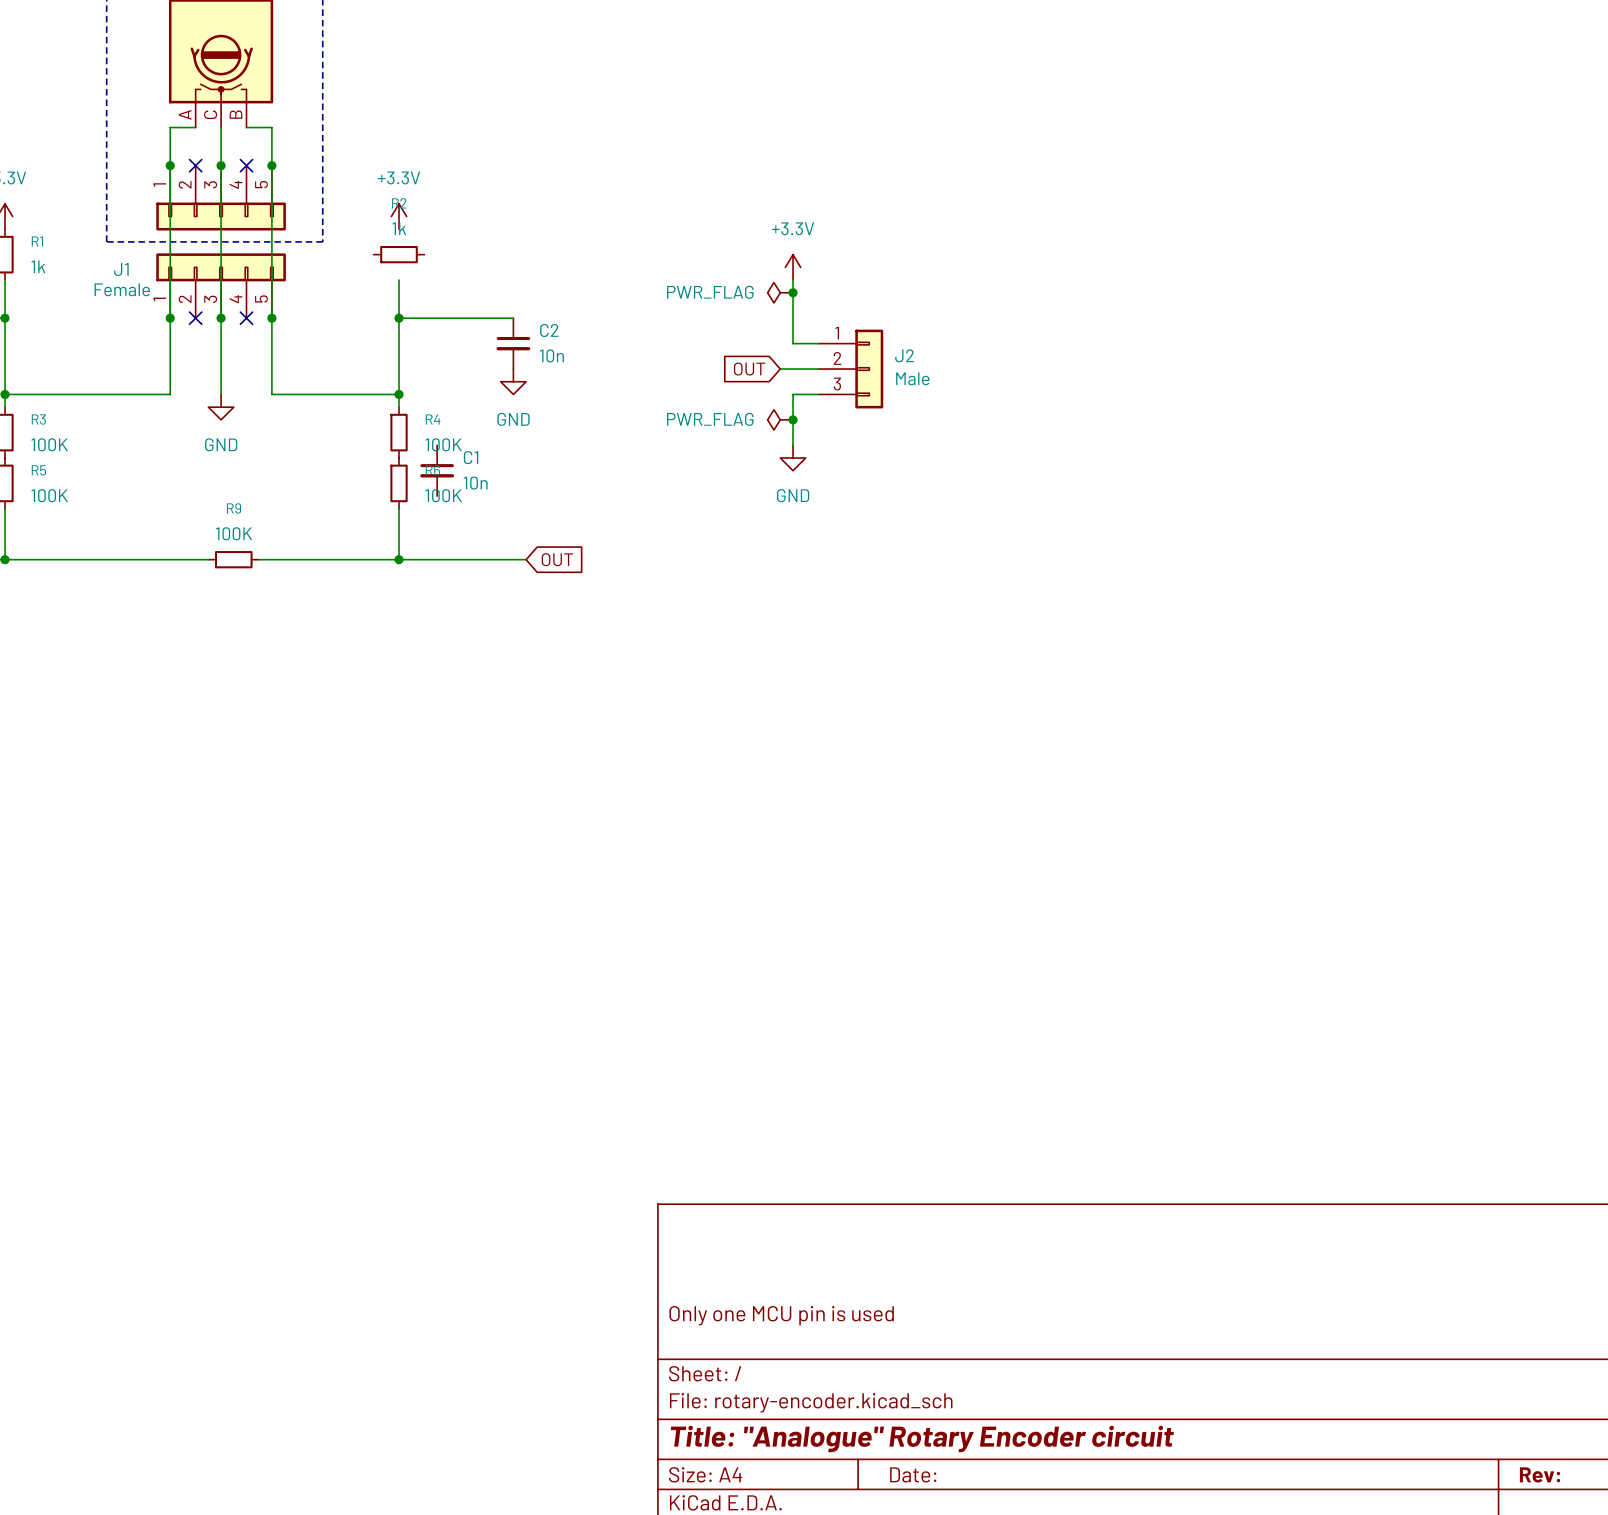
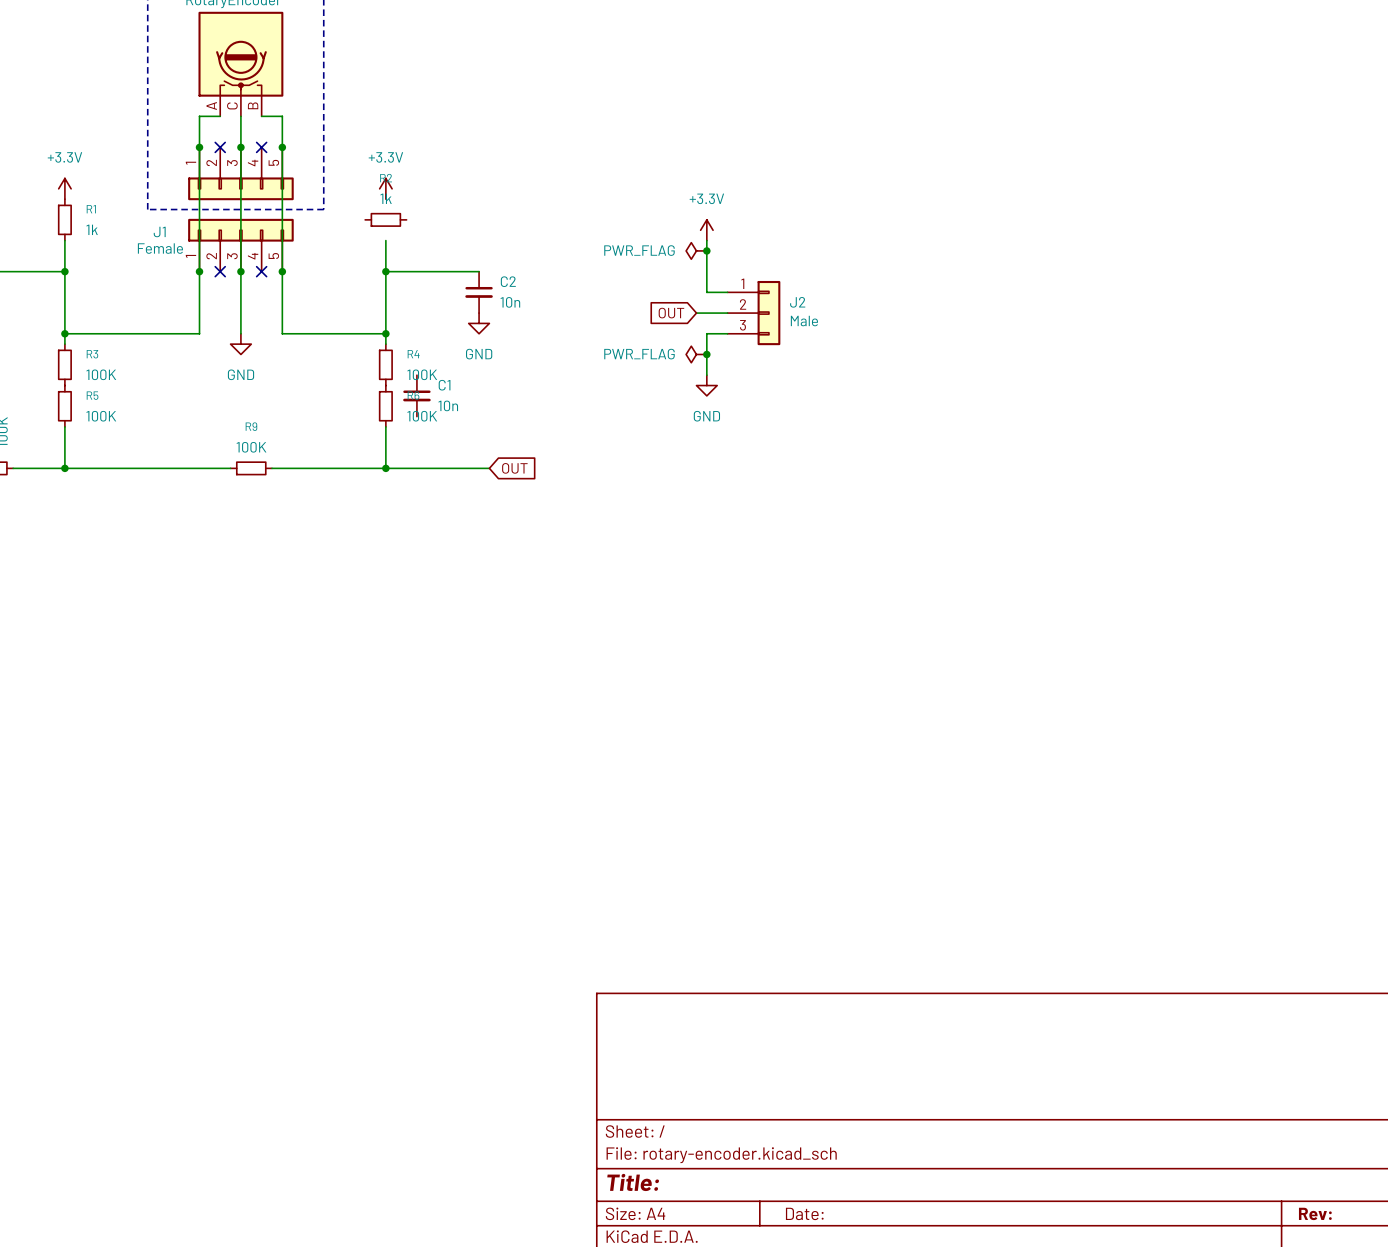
title block: Only one MCU pin is used (781, 1315) -> none
title block: Title: "Analogue" Rotary Encoder circuit (922, 1439) -> Title: (633, 1182)

